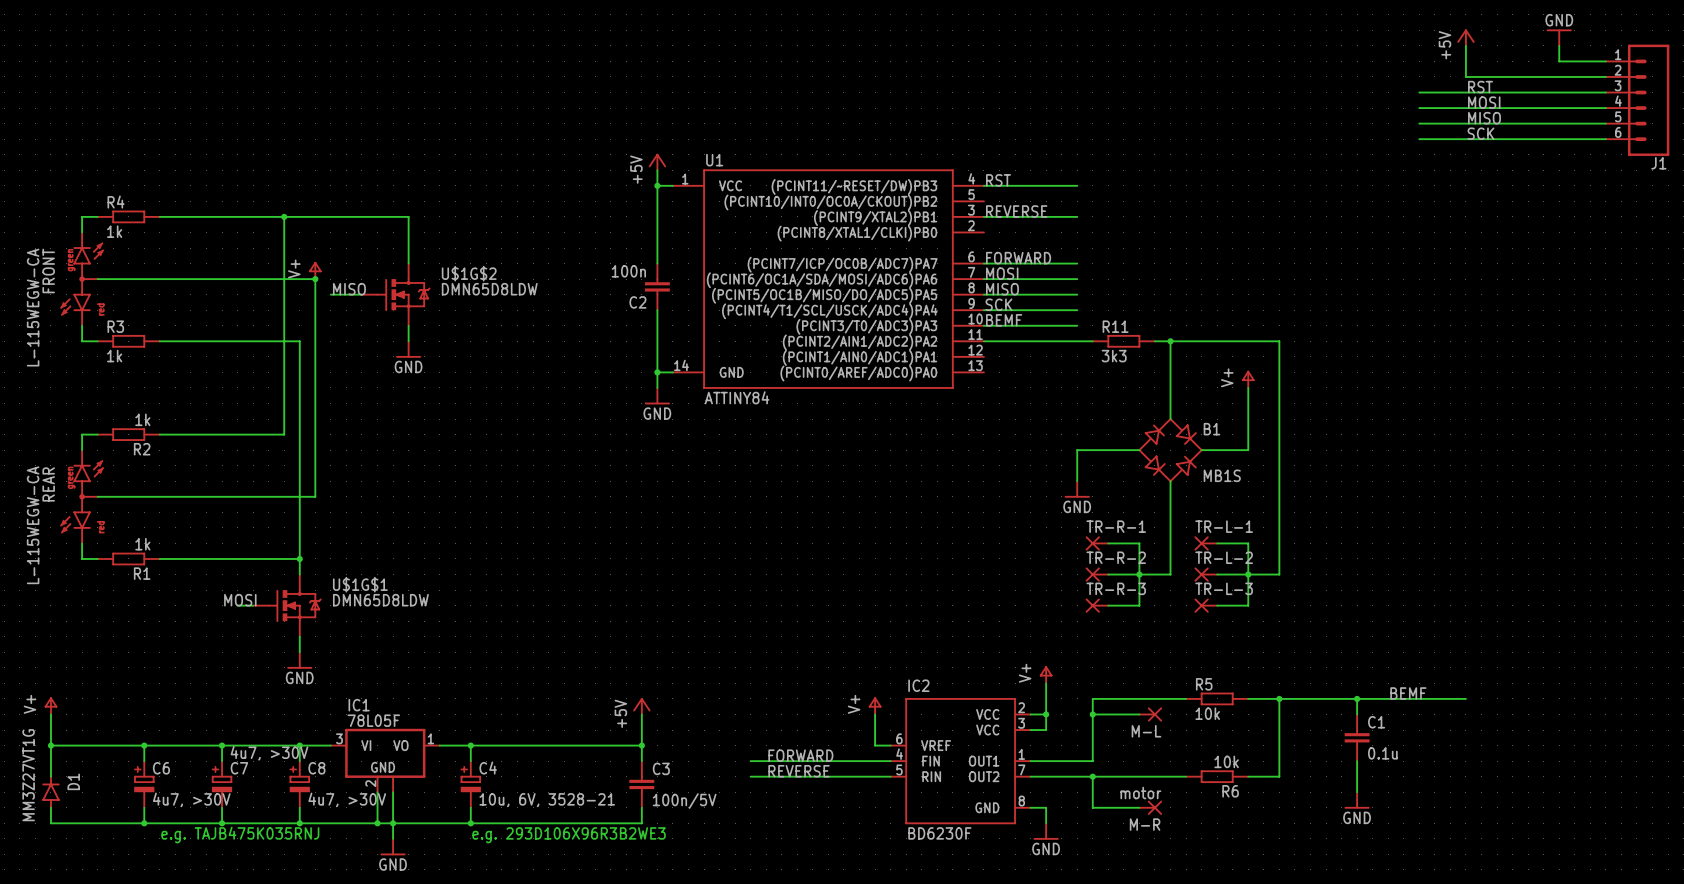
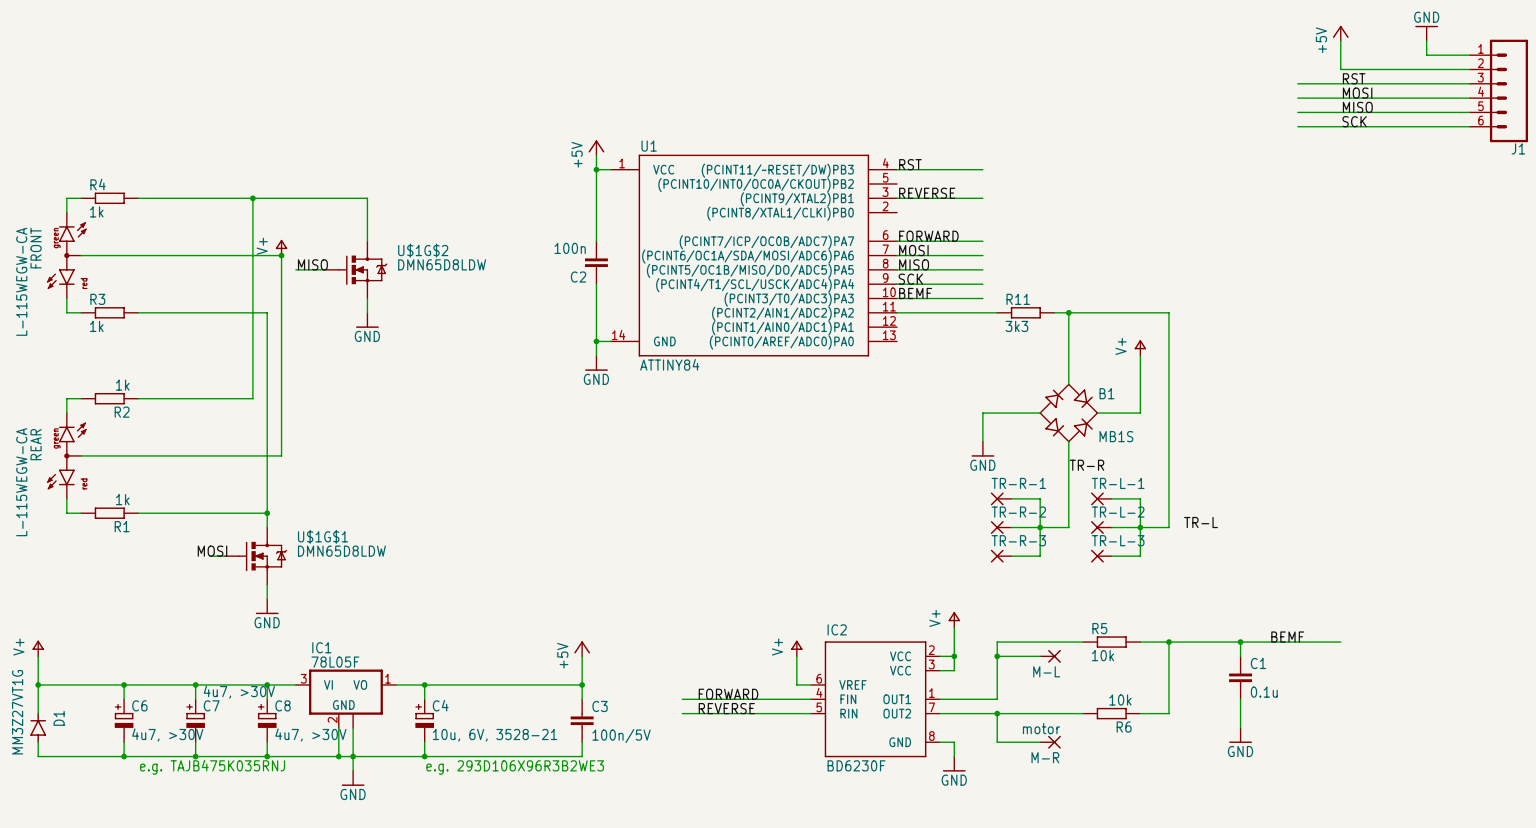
label: none -> TR-R (1086, 465)
label: none -> TR-L (1201, 522)

